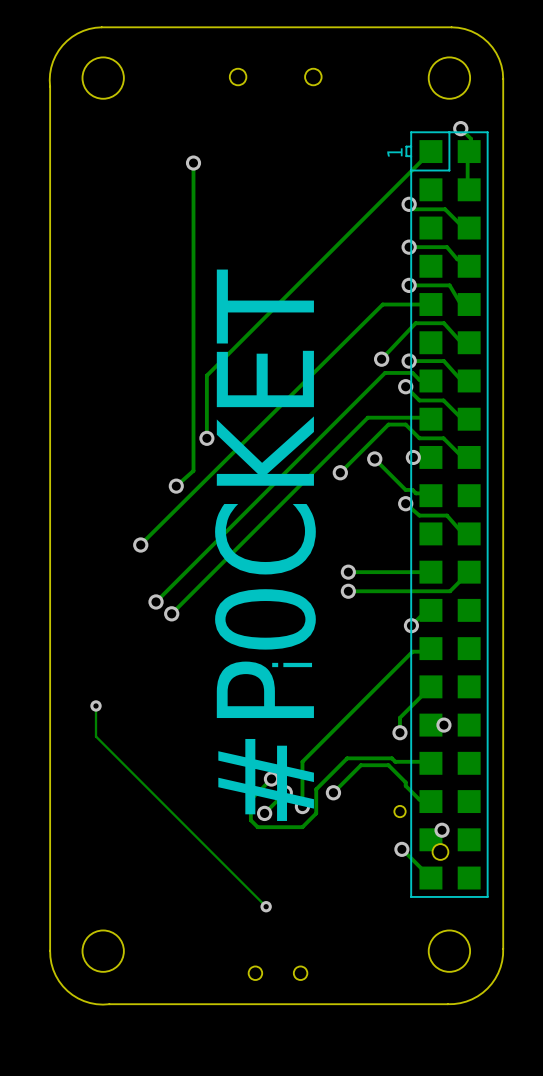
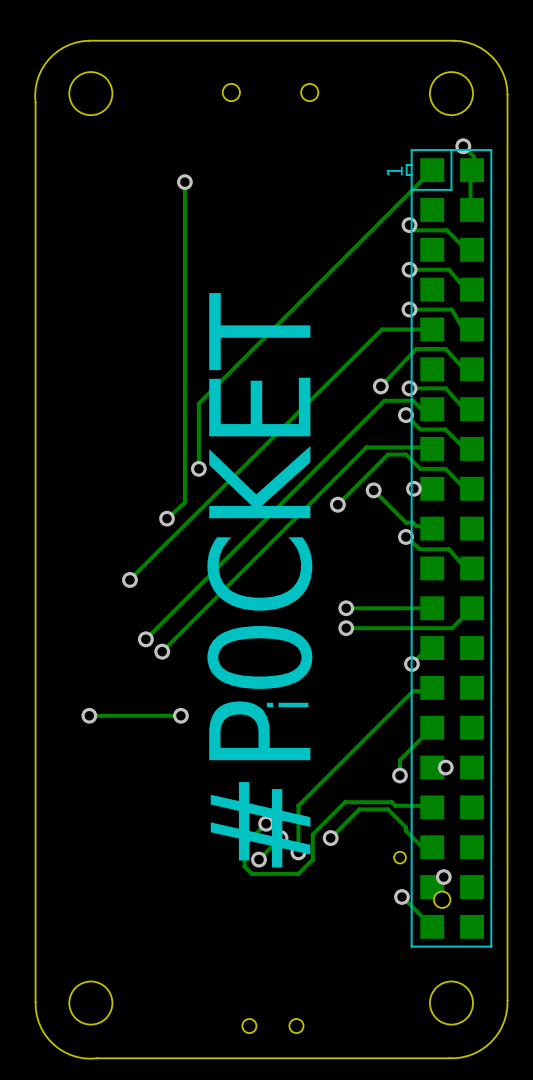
via: none -> (89, 715)
track: none -> (180, 715) (89, 715)
via: none -> (180, 715)
track: (96, 705) (96, 736) (266, 906) -> none
via: (96, 705) -> none
via: (266, 906) -> none

